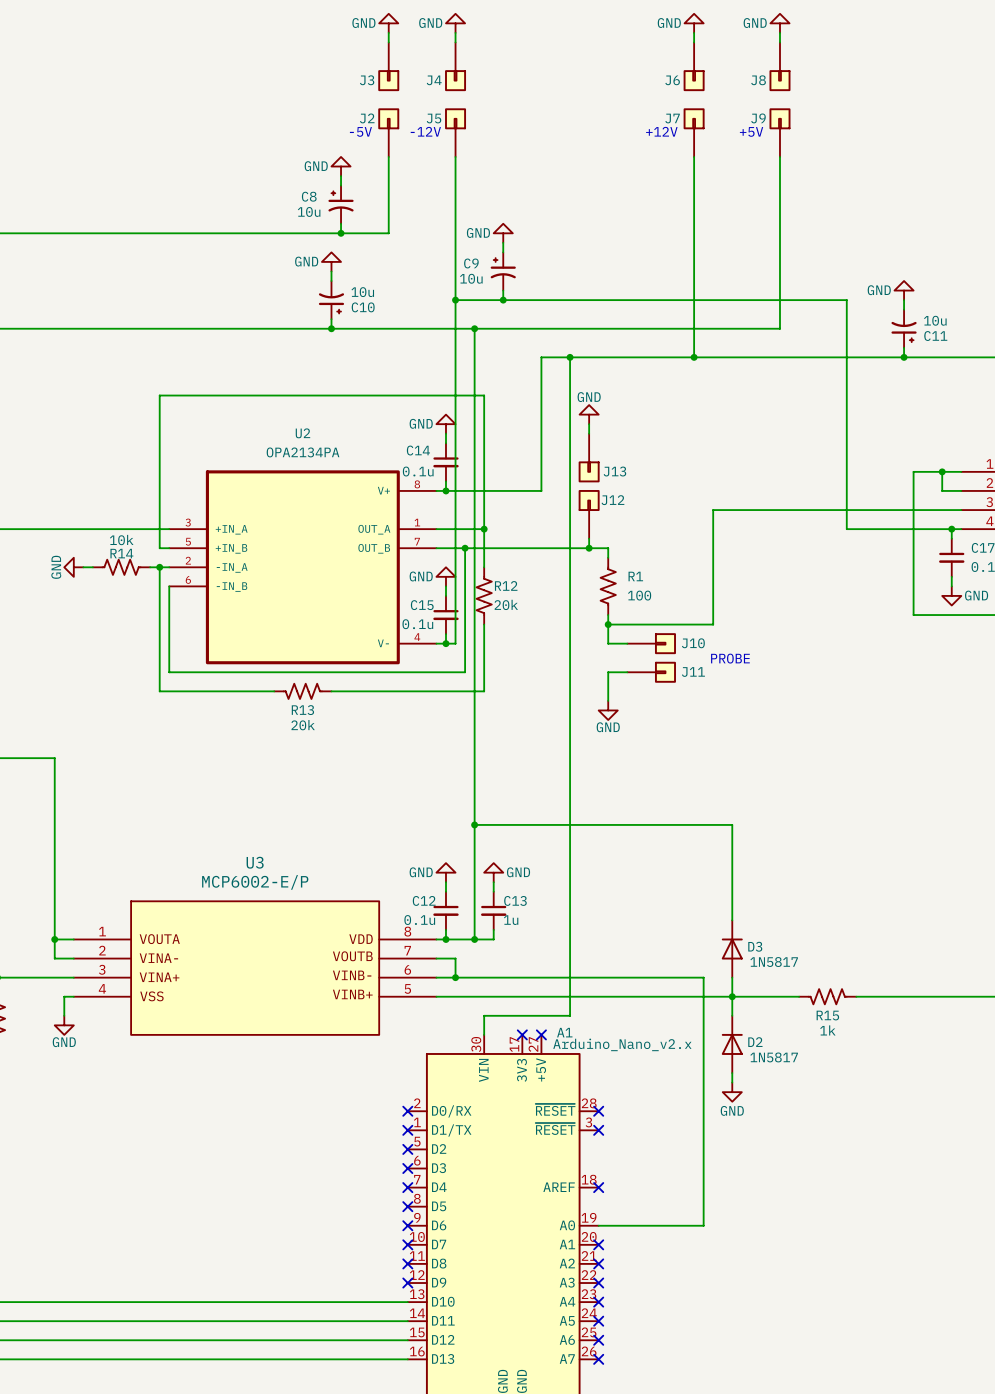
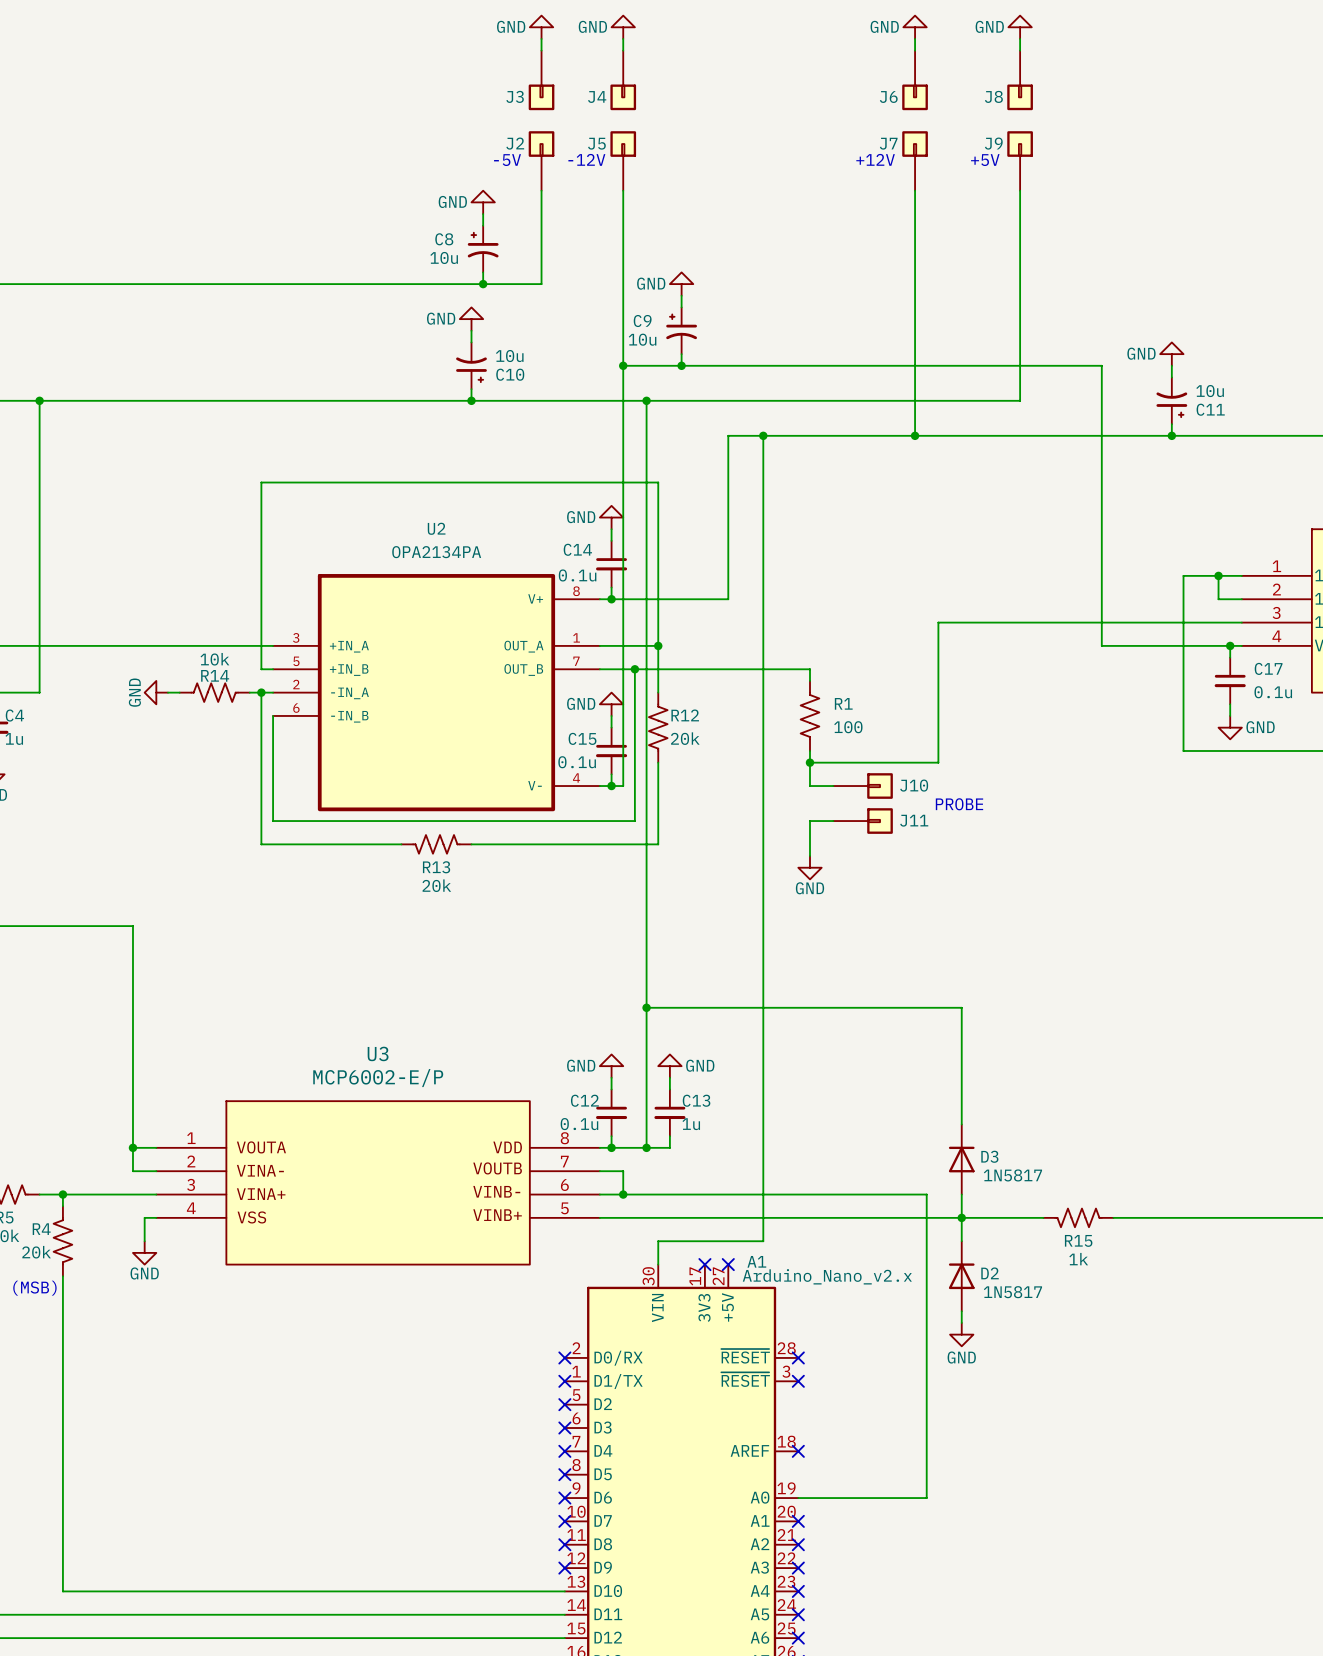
power symbol: GND (589, 414) -> none
wire: (589, 424) (589, 433) -> none
J13: (589, 458) -> none
J12: (589, 514) -> none
wire: (589, 538) (589, 548) -> none
junction: (589, 548) -> none

